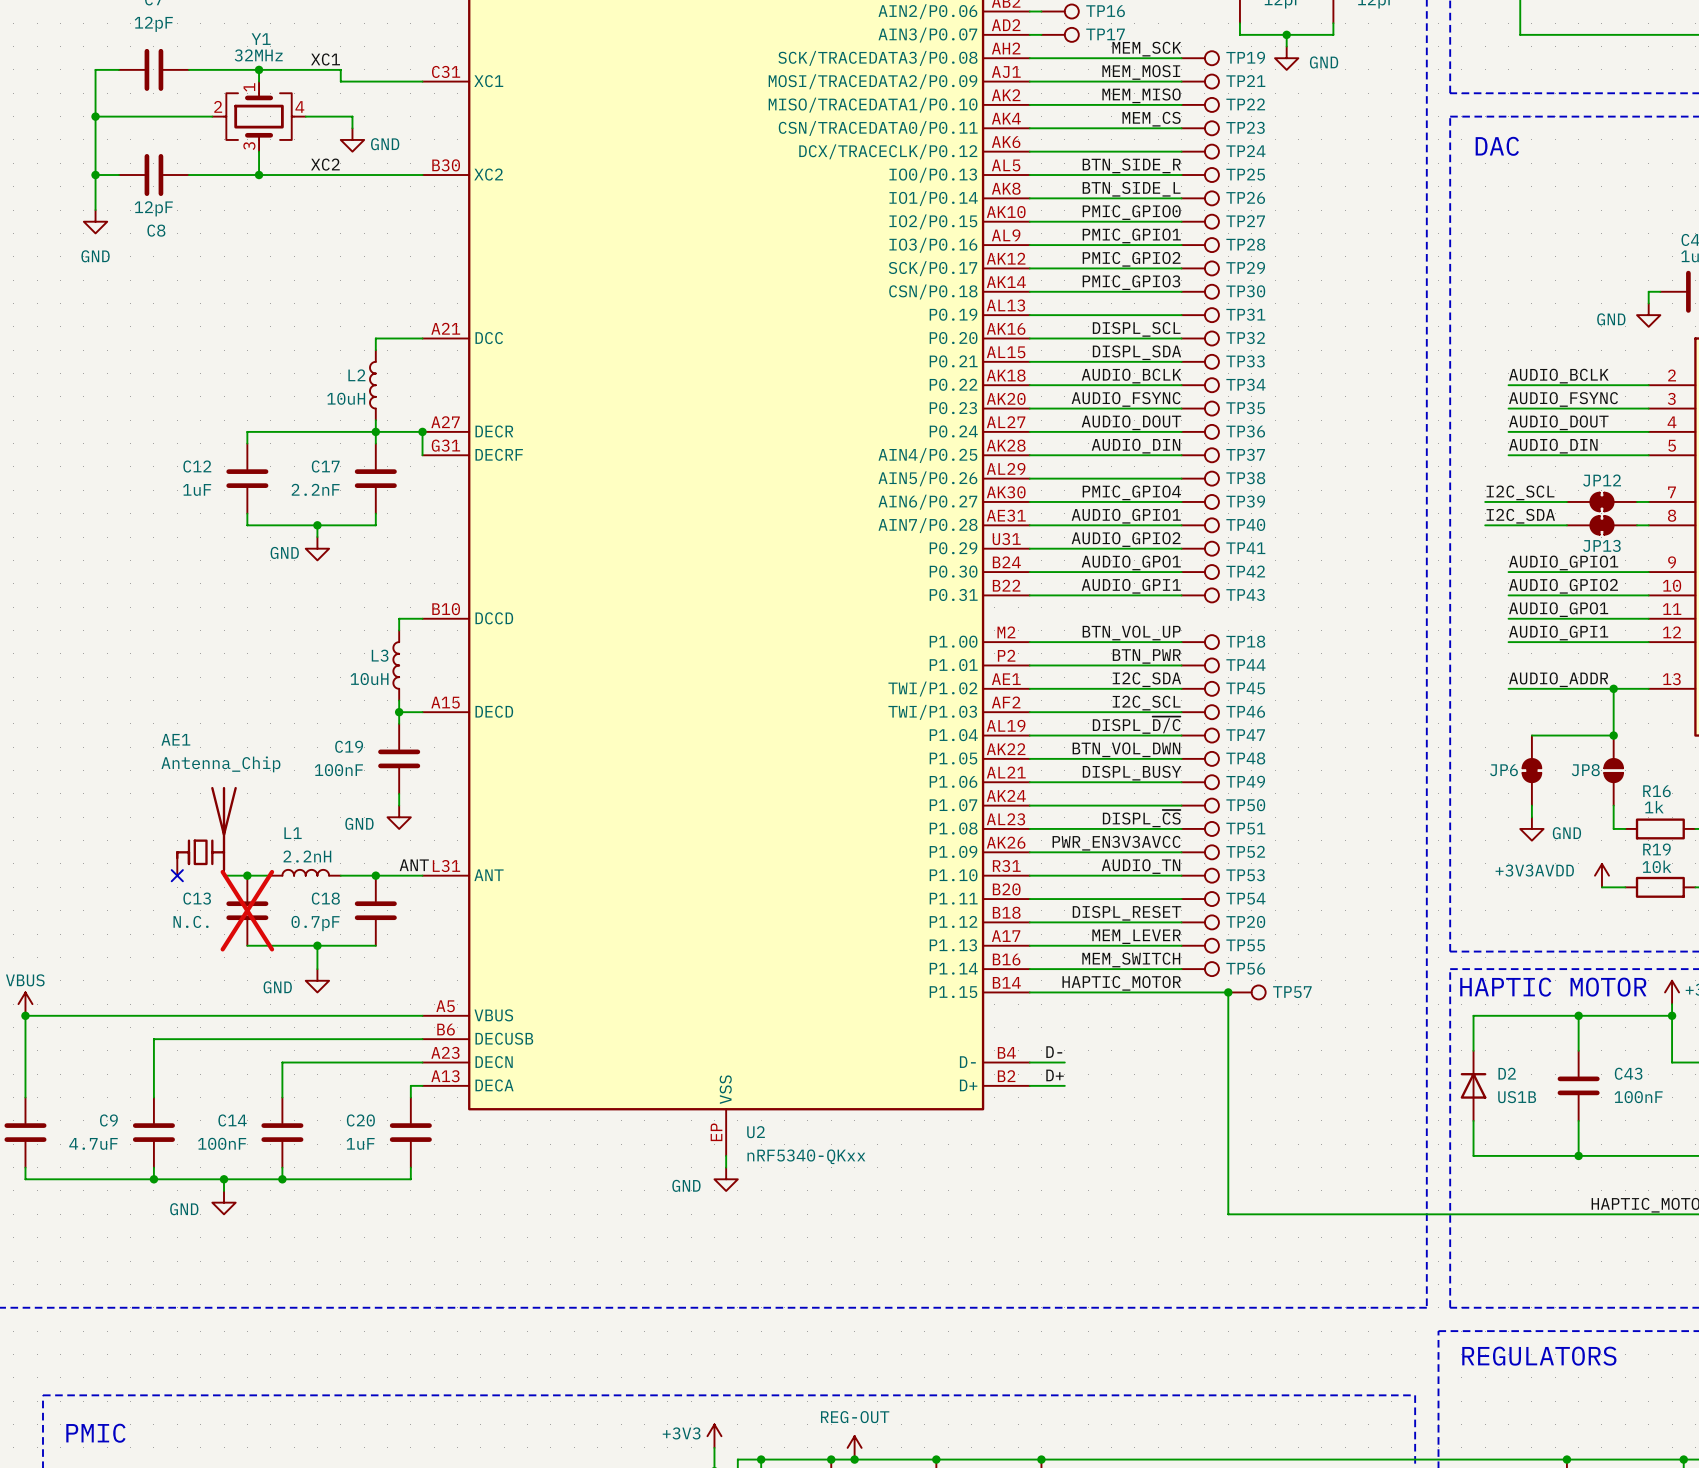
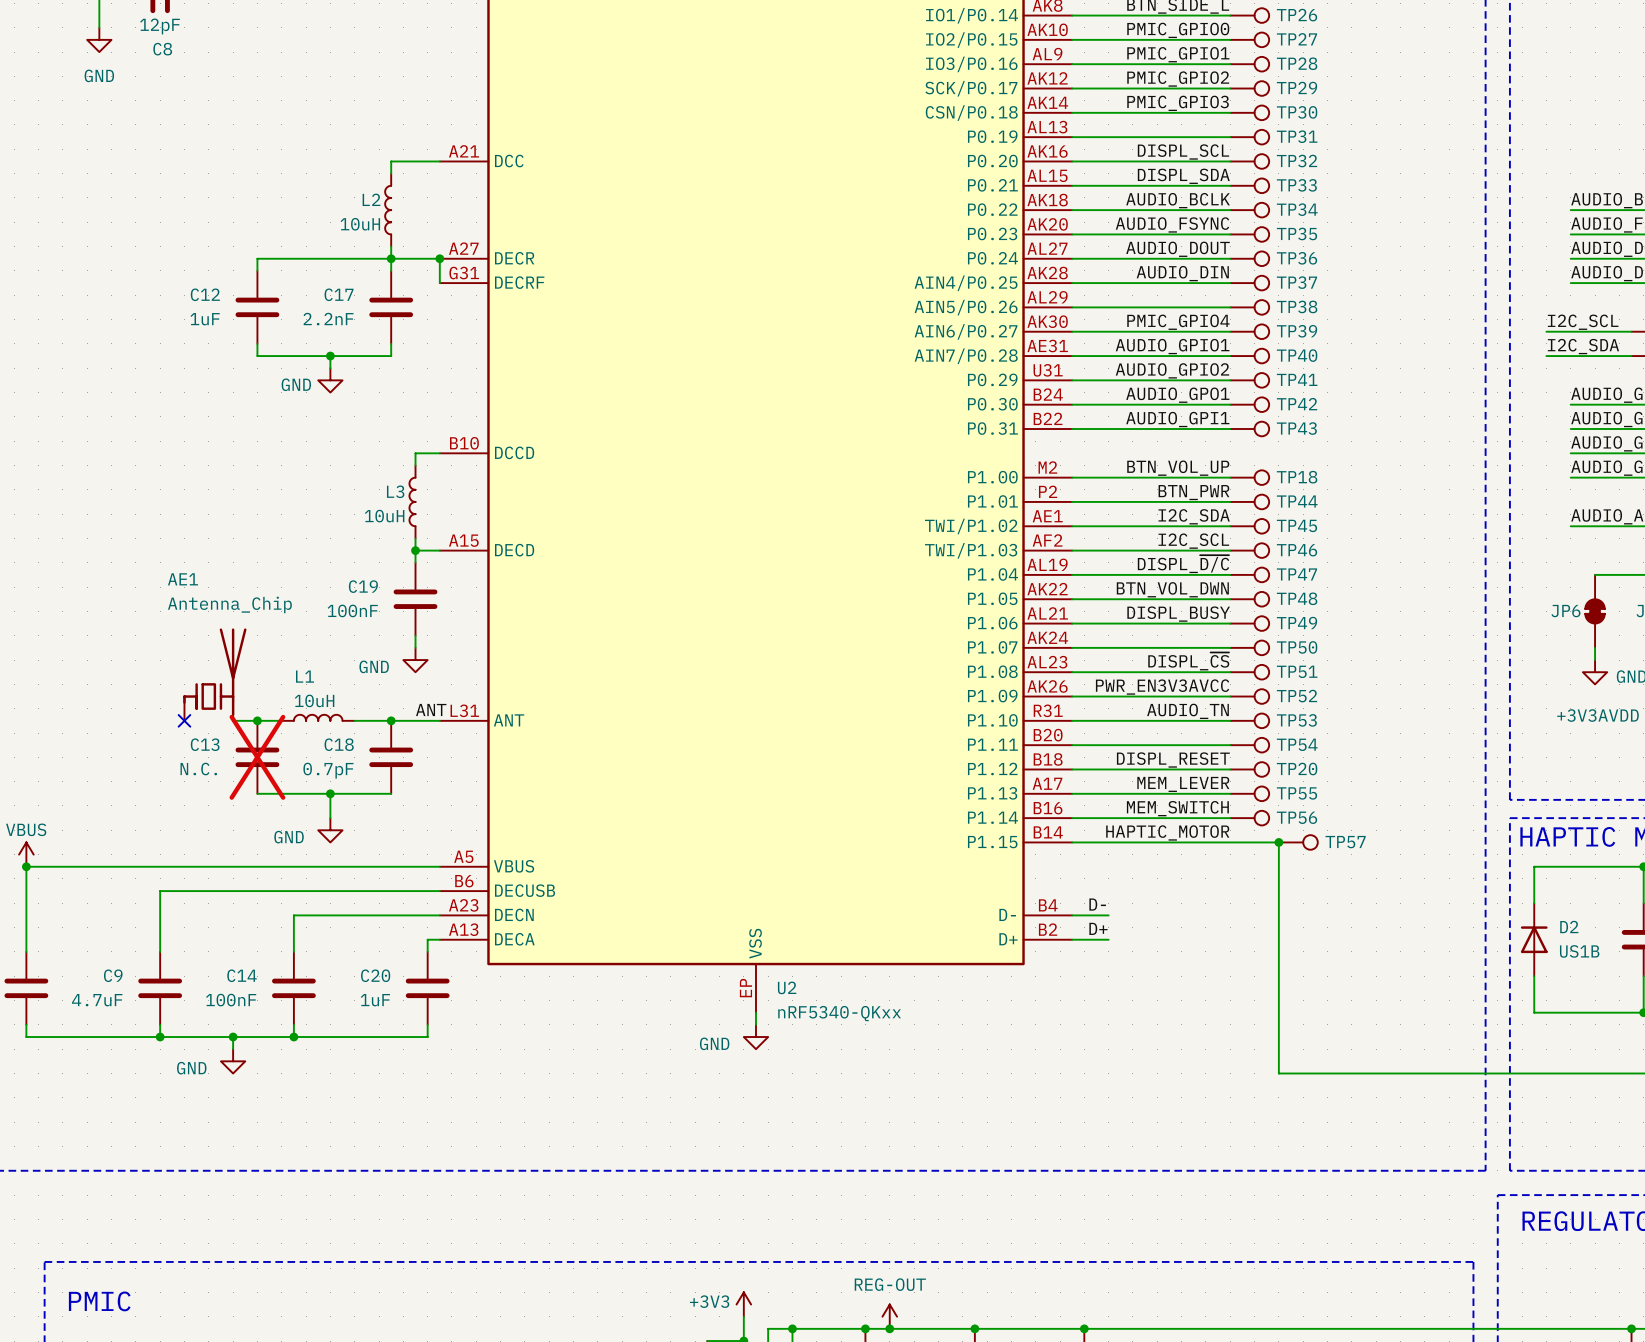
L1 value: 2.2nH (307, 856) -> 10uH (314, 700)

